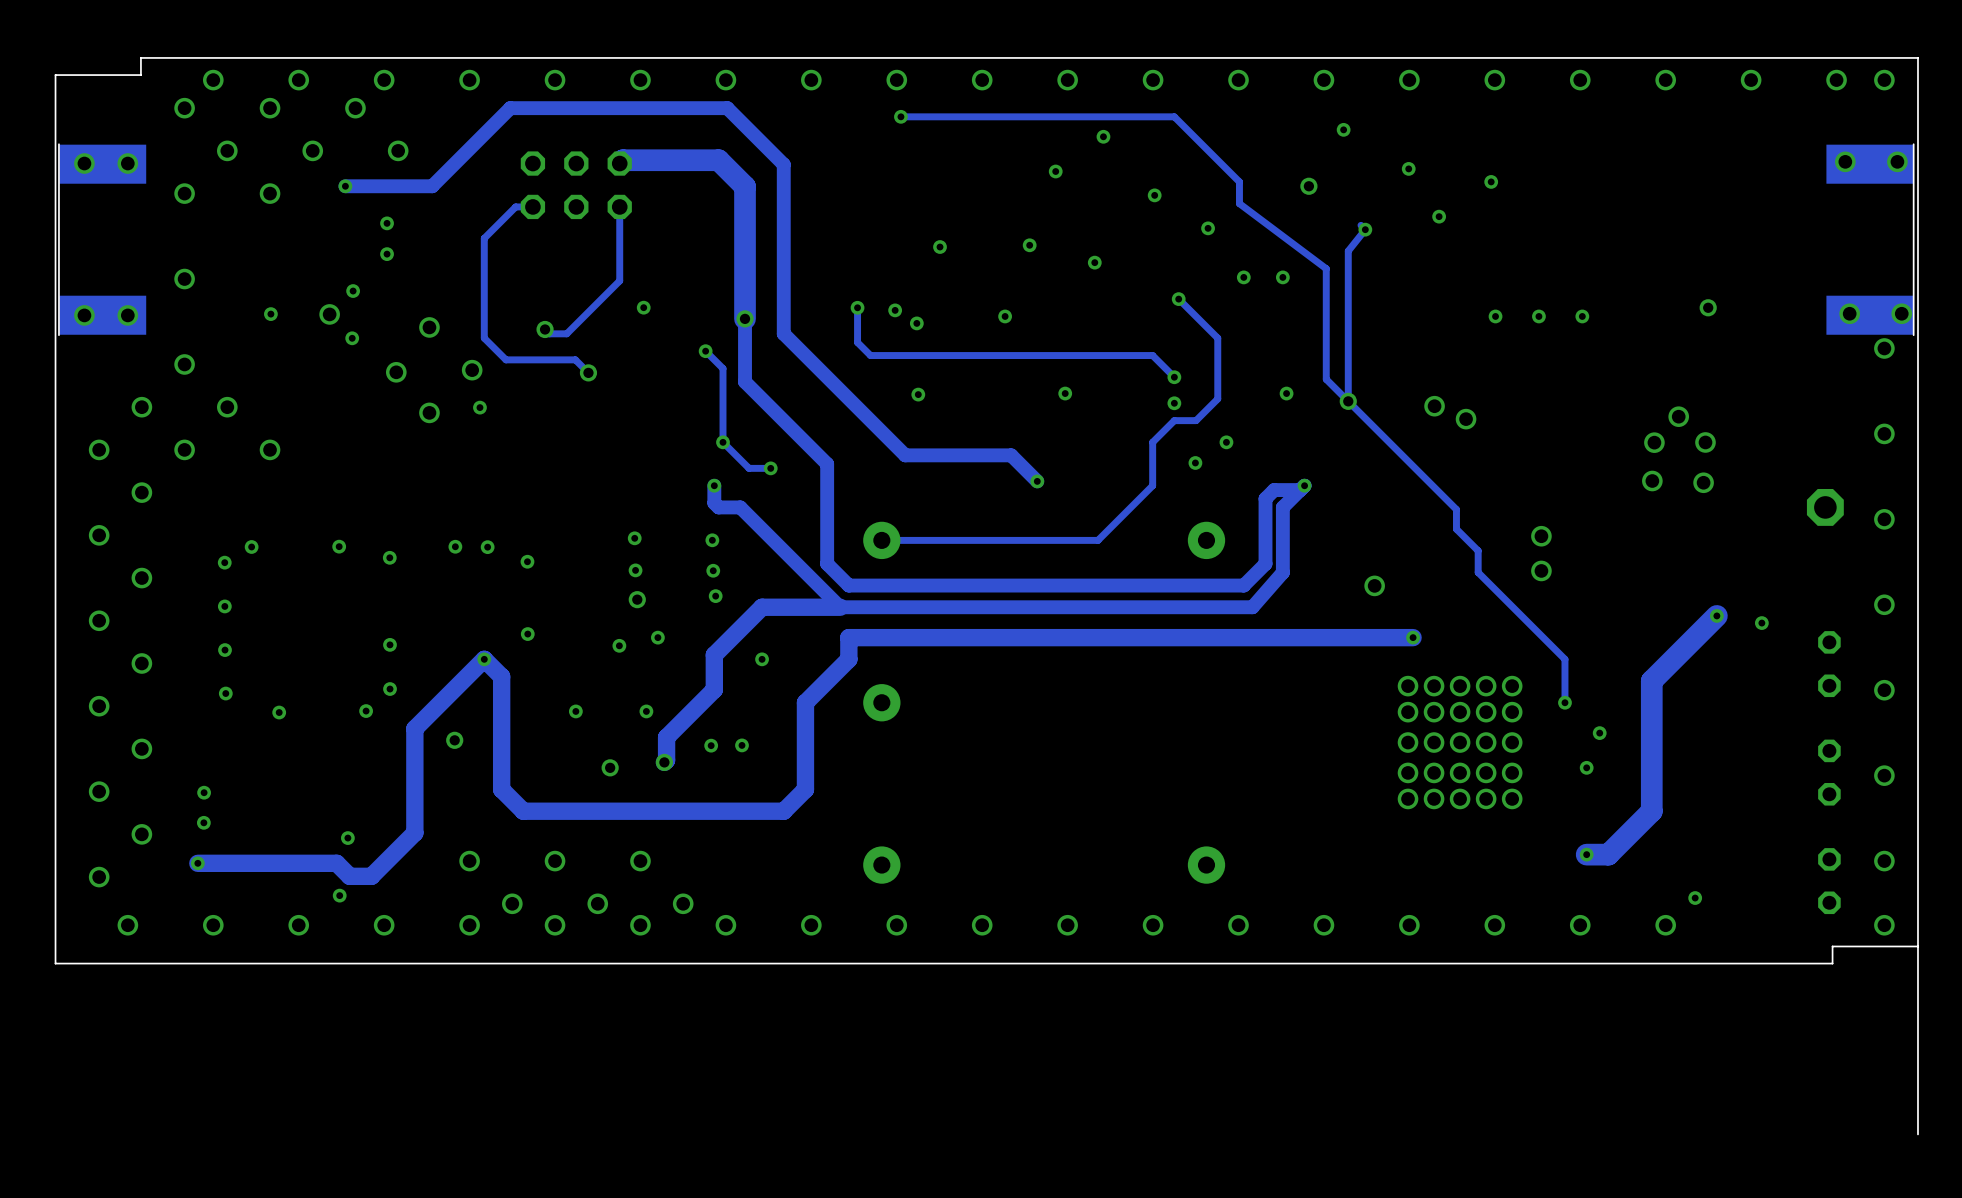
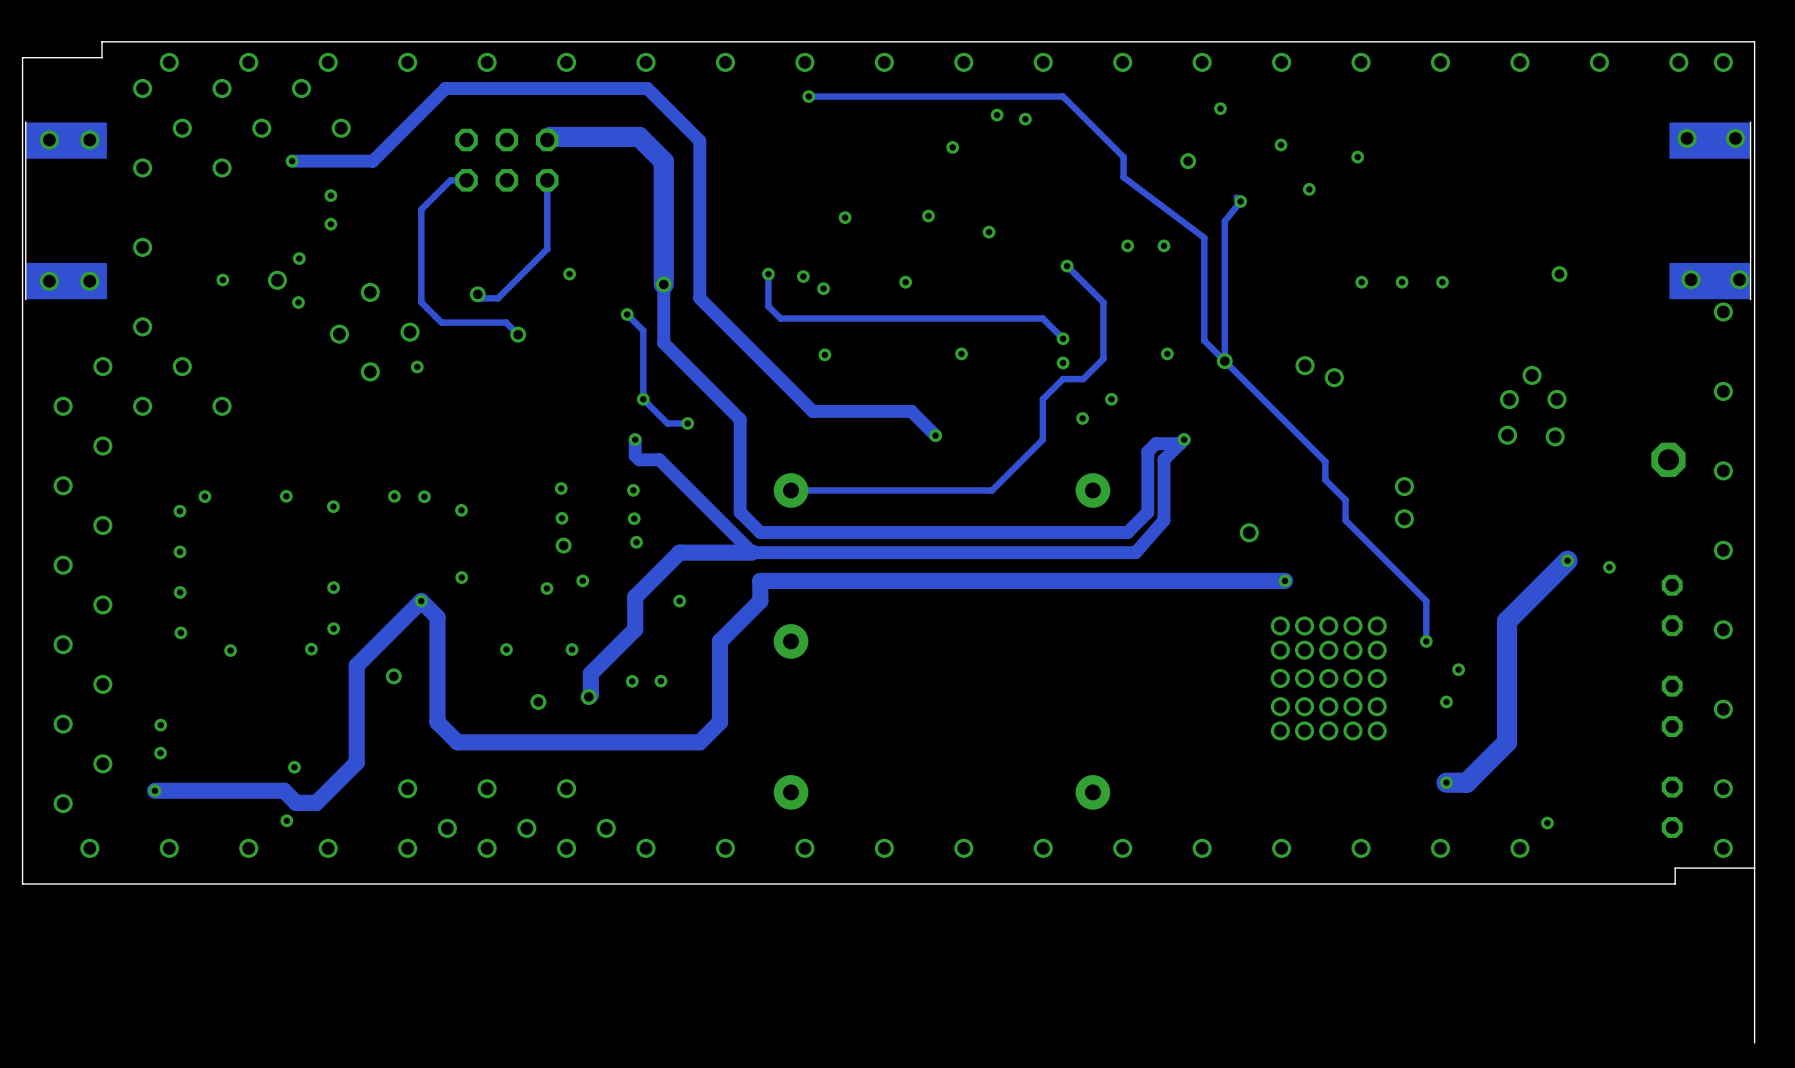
via: none -> (1025, 119)
via: (1154, 195) -> none
via: (1208, 228) -> none

